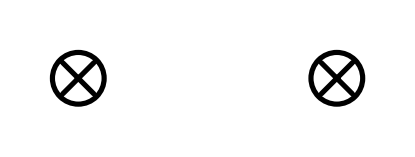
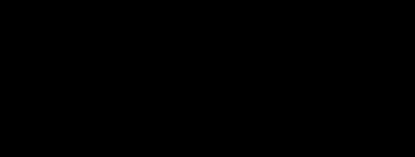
part: (78, 78) -> none
part: (336, 78) -> none

